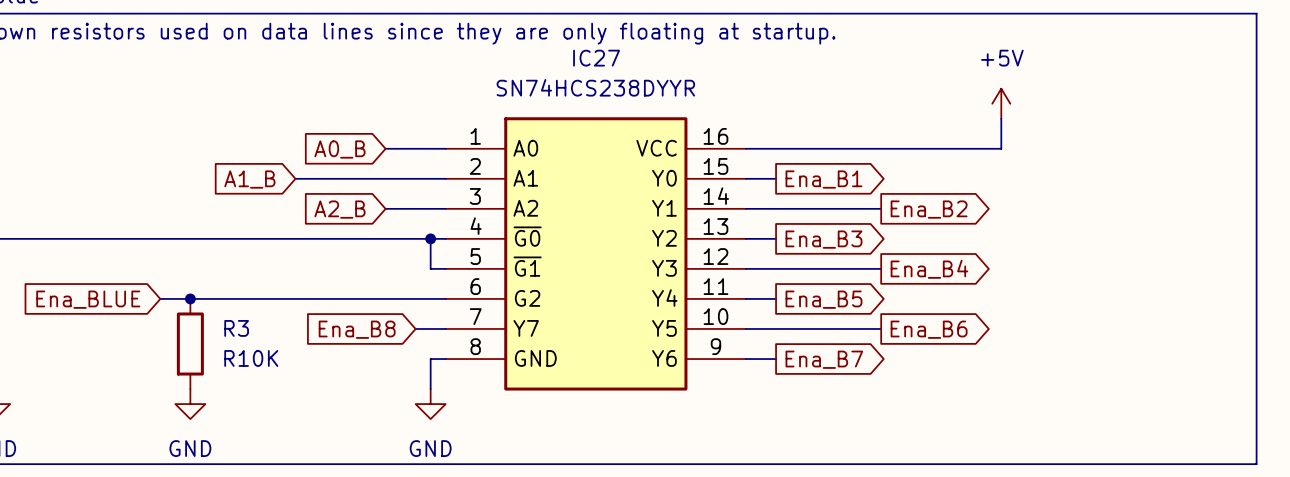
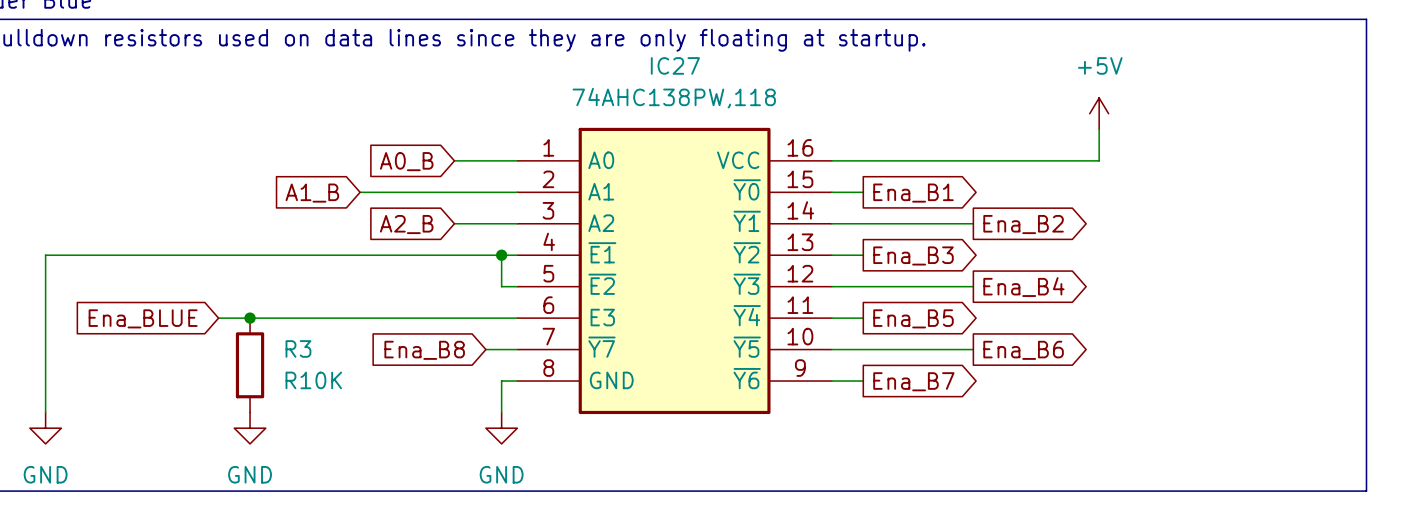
IC27 value: SN74HCS238DYYR (595, 87) -> 74AHC138PW,118 (674, 98)
IC27 symbol: [445, 117, 747, 391] -> [517, 127, 832, 415]

